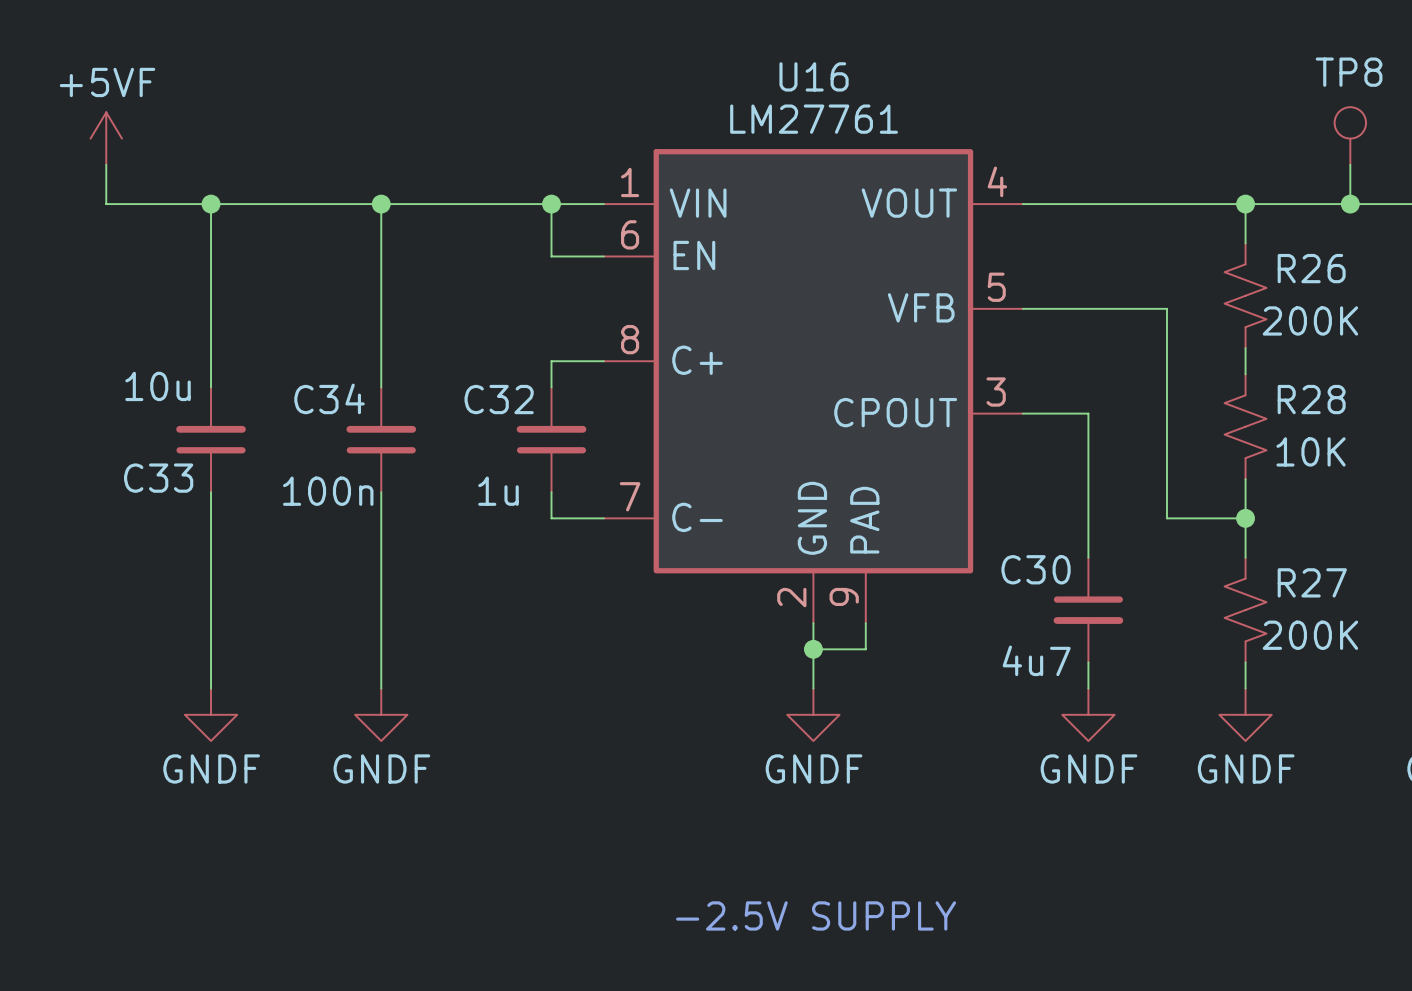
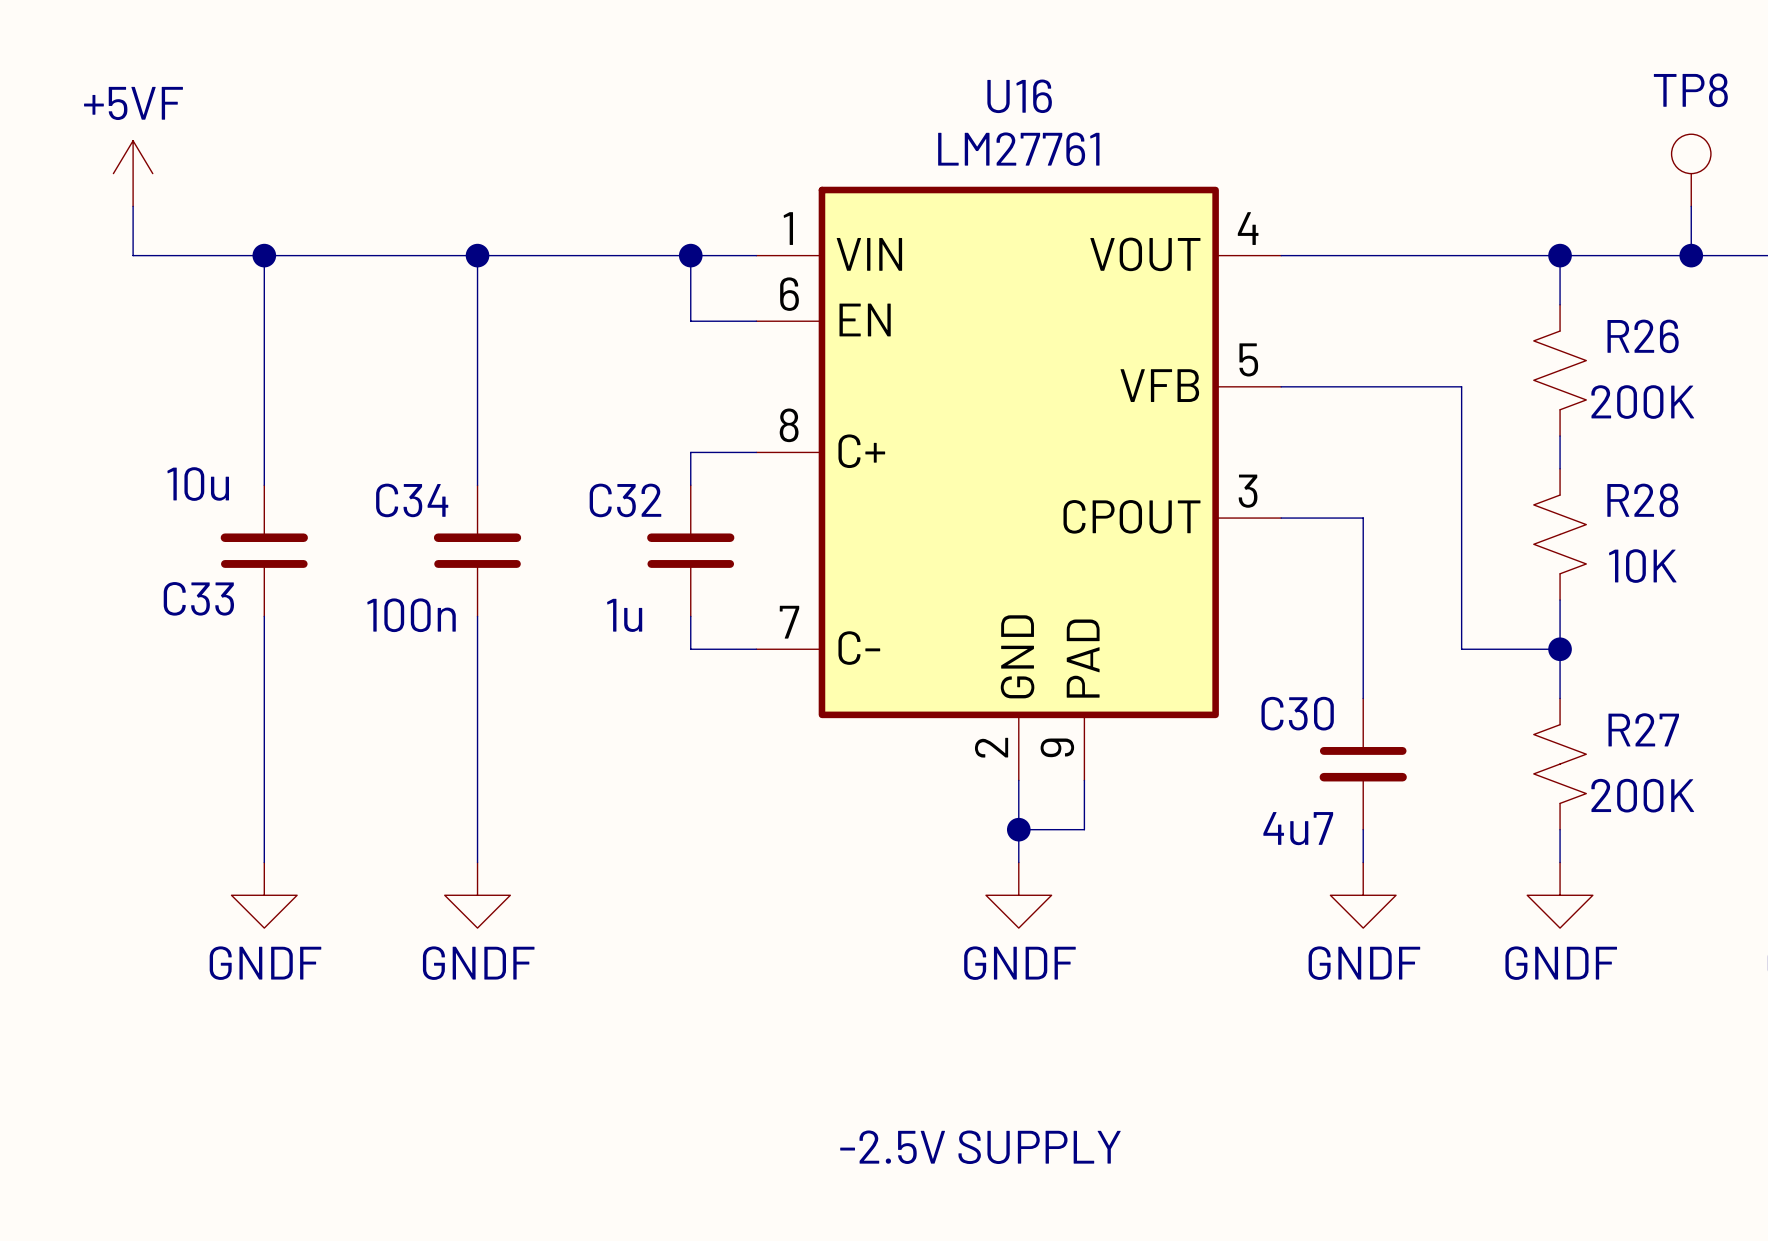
wire: (813, 649) (865, 649) -> (1018, 829) (1084, 829) (1084, 813)
junction position: (813, 649) -> (1018, 829)

